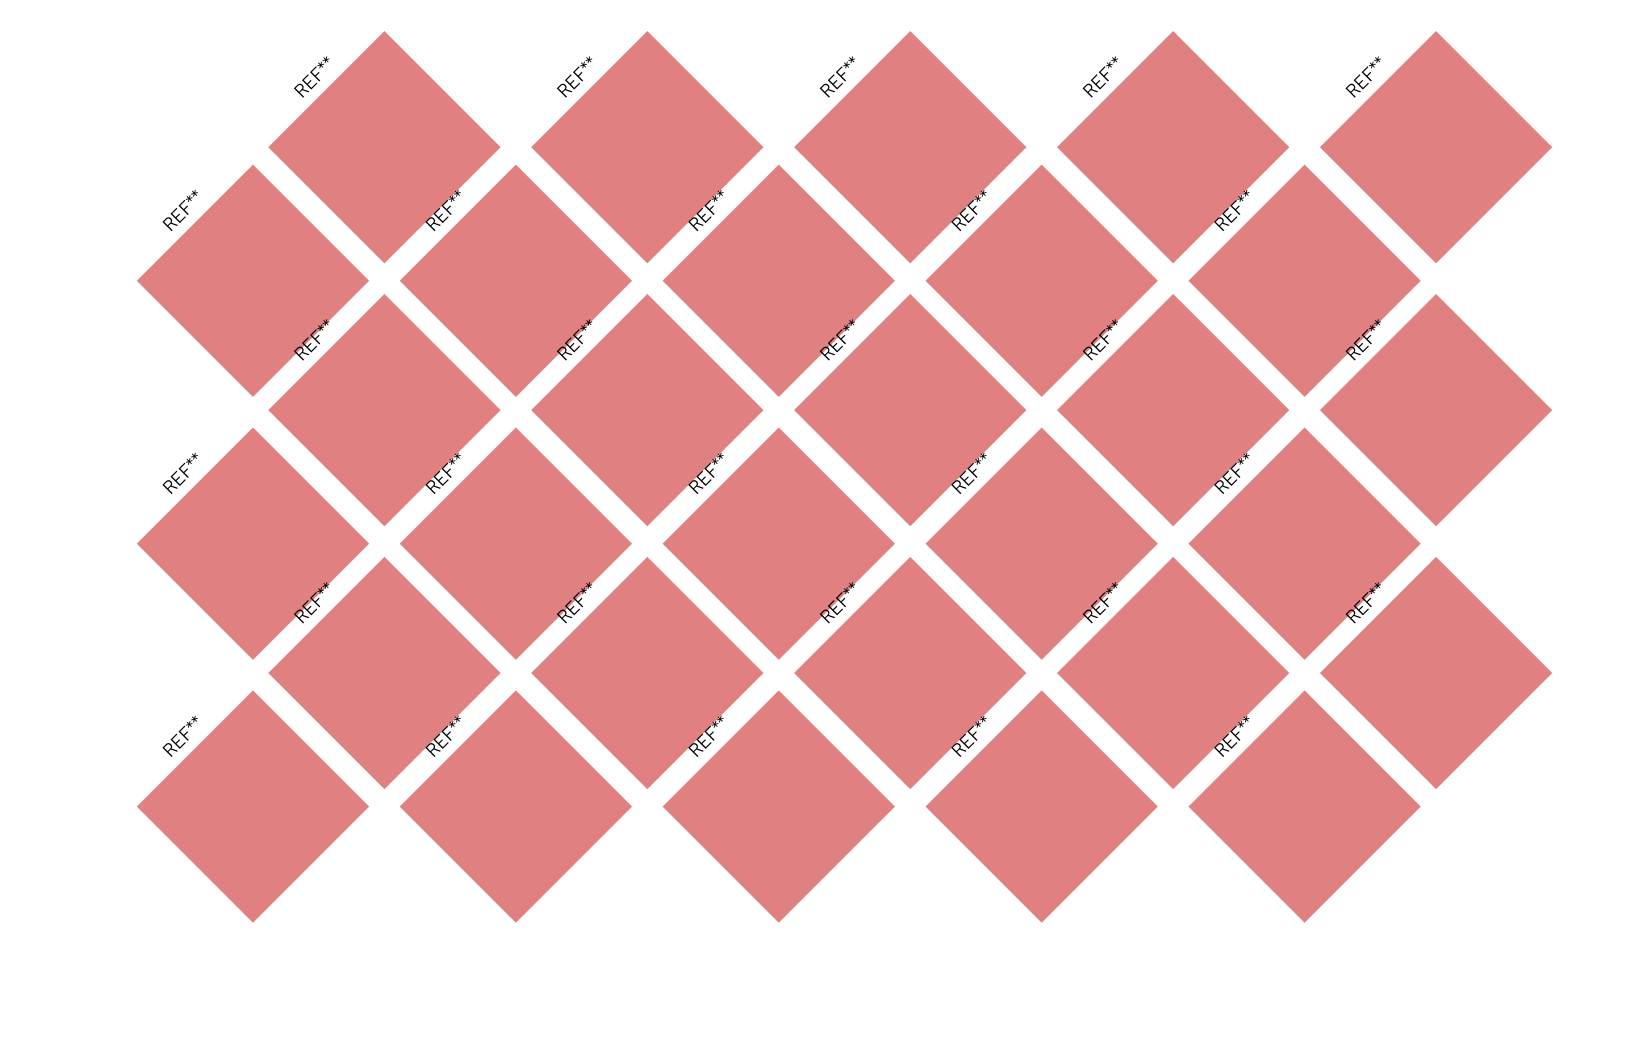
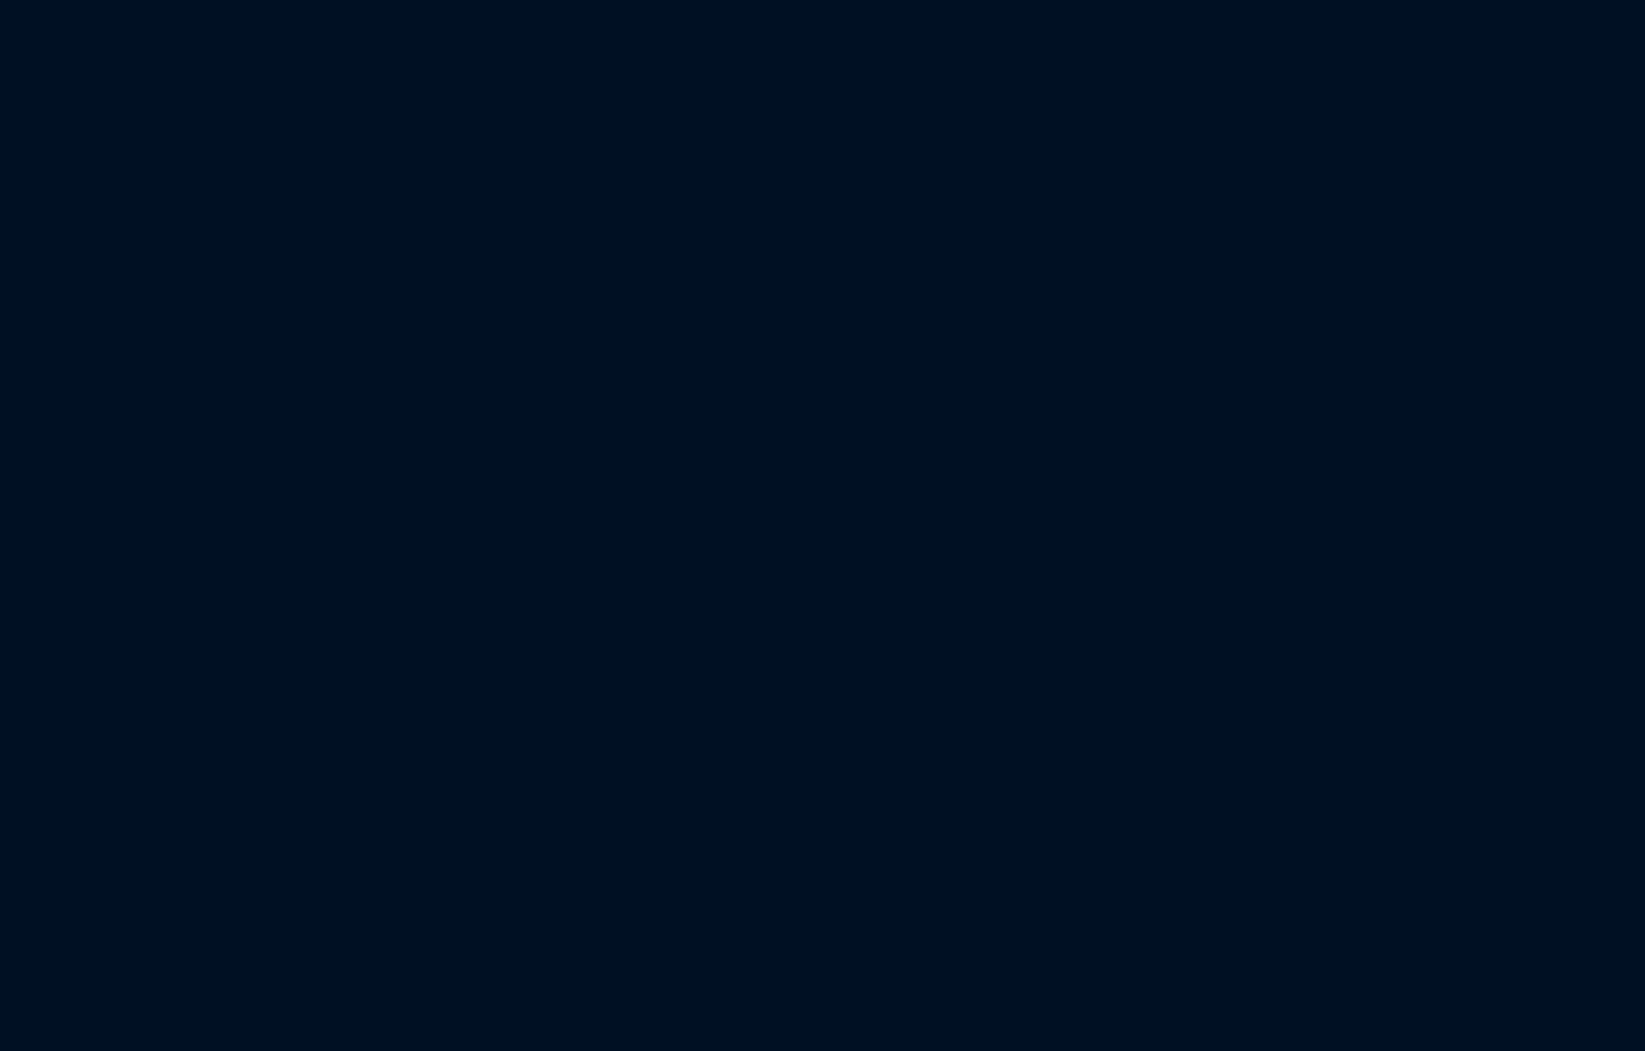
REF**: (384, 147) -> none
REF**: (647, 147) -> none
REF**: (910, 147) -> none
REF**: (1173, 147) -> none
REF**: (1436, 147) -> none
REF**: (252, 280) -> none
REF**: (515, 280) -> none
REF**: (778, 280) -> none
REF**: (1041, 280) -> none
REF**: (1304, 280) -> none
REF**: (384, 410) -> none
REF**: (647, 410) -> none
REF**: (910, 410) -> none
REF**: (1173, 410) -> none
REF**: (1436, 410) -> none
REF**: (252, 543) -> none
REF**: (515, 543) -> none
REF**: (778, 543) -> none
REF**: (1041, 543) -> none
REF**: (1304, 543) -> none
REF**: (384, 673) -> none
REF**: (647, 673) -> none
REF**: (910, 673) -> none
REF**: (1173, 673) -> none
REF**: (1436, 673) -> none
REF**: (252, 806) -> none
REF**: (515, 806) -> none
REF**: (778, 806) -> none
REF**: (1041, 806) -> none
REF**: (1304, 806) -> none

